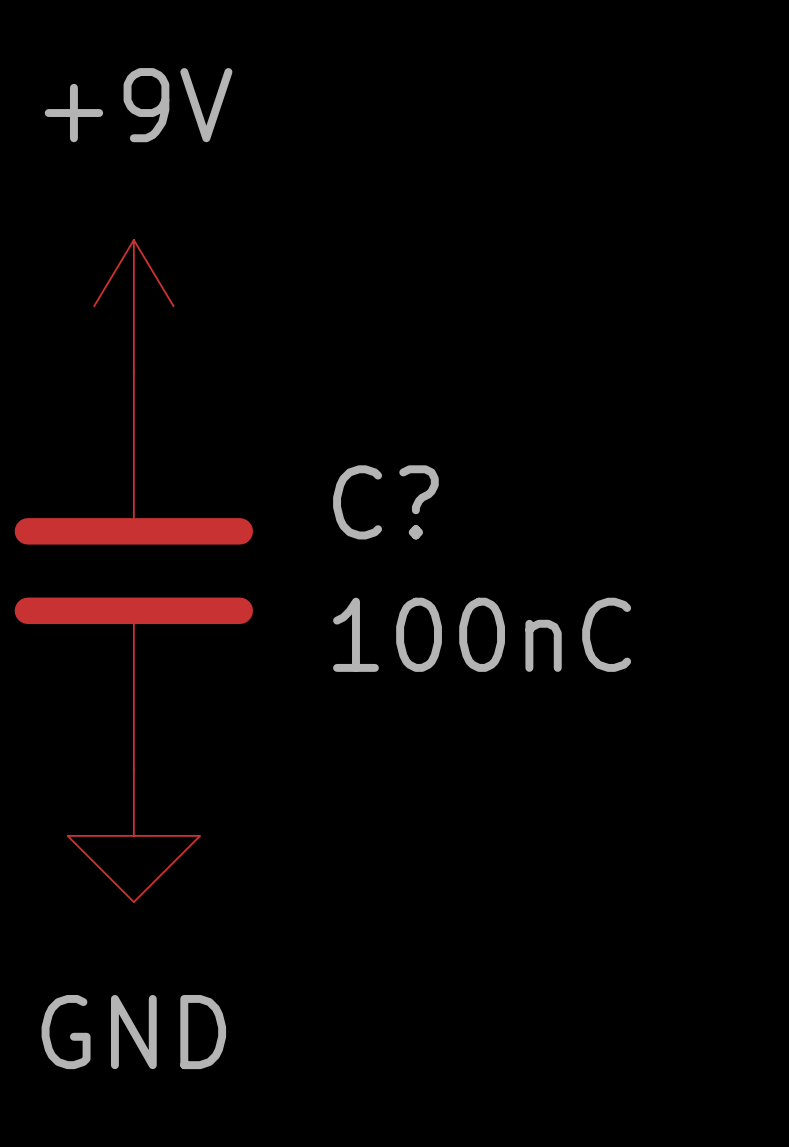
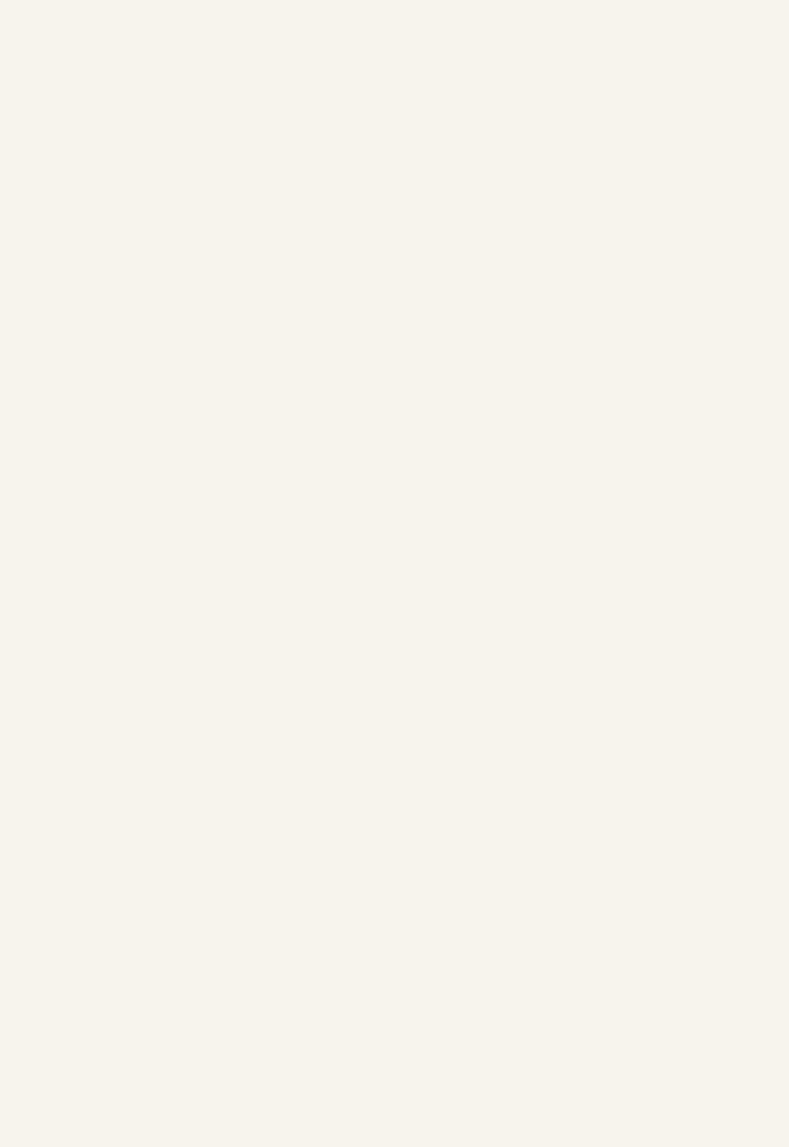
power symbol: +9V (133, 306) -> none
C?: 100nC (133, 571) -> none
power symbol: GND (133, 835) -> none

